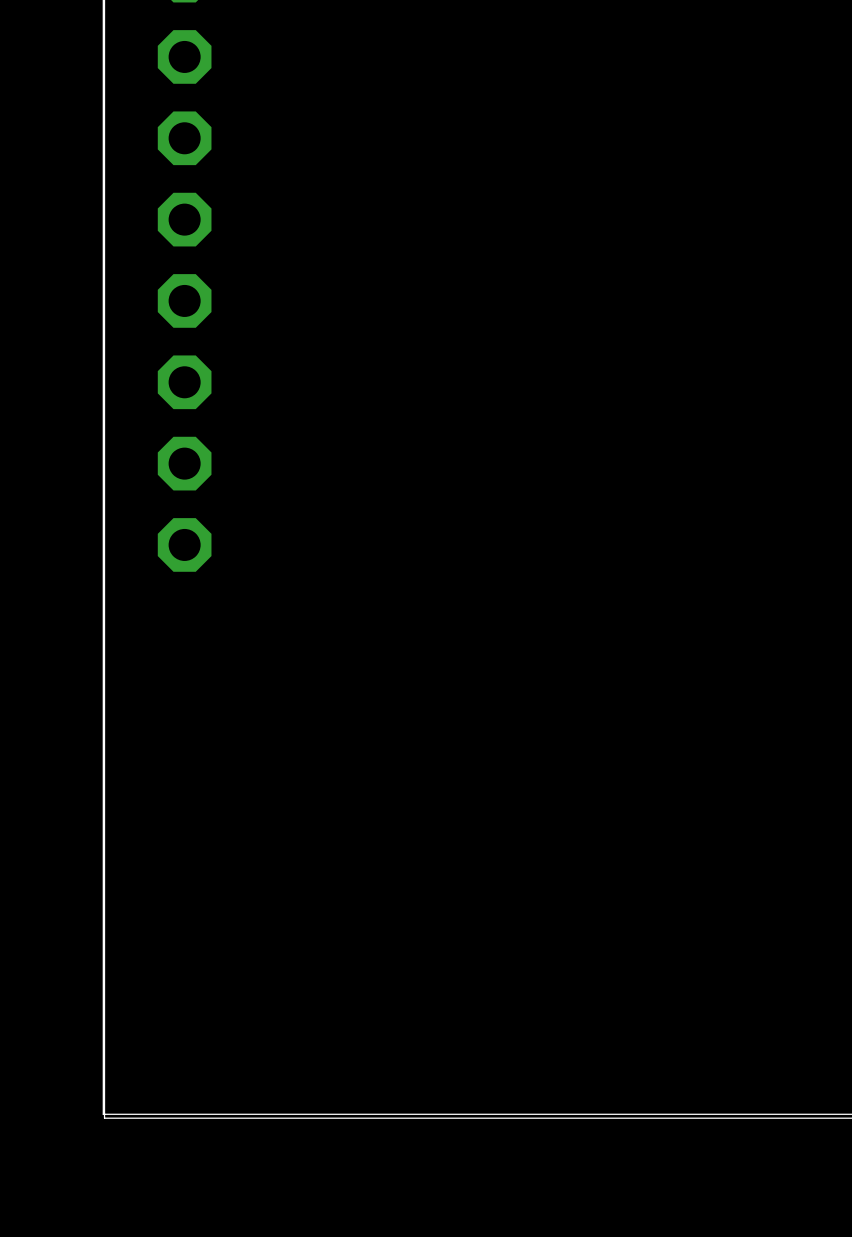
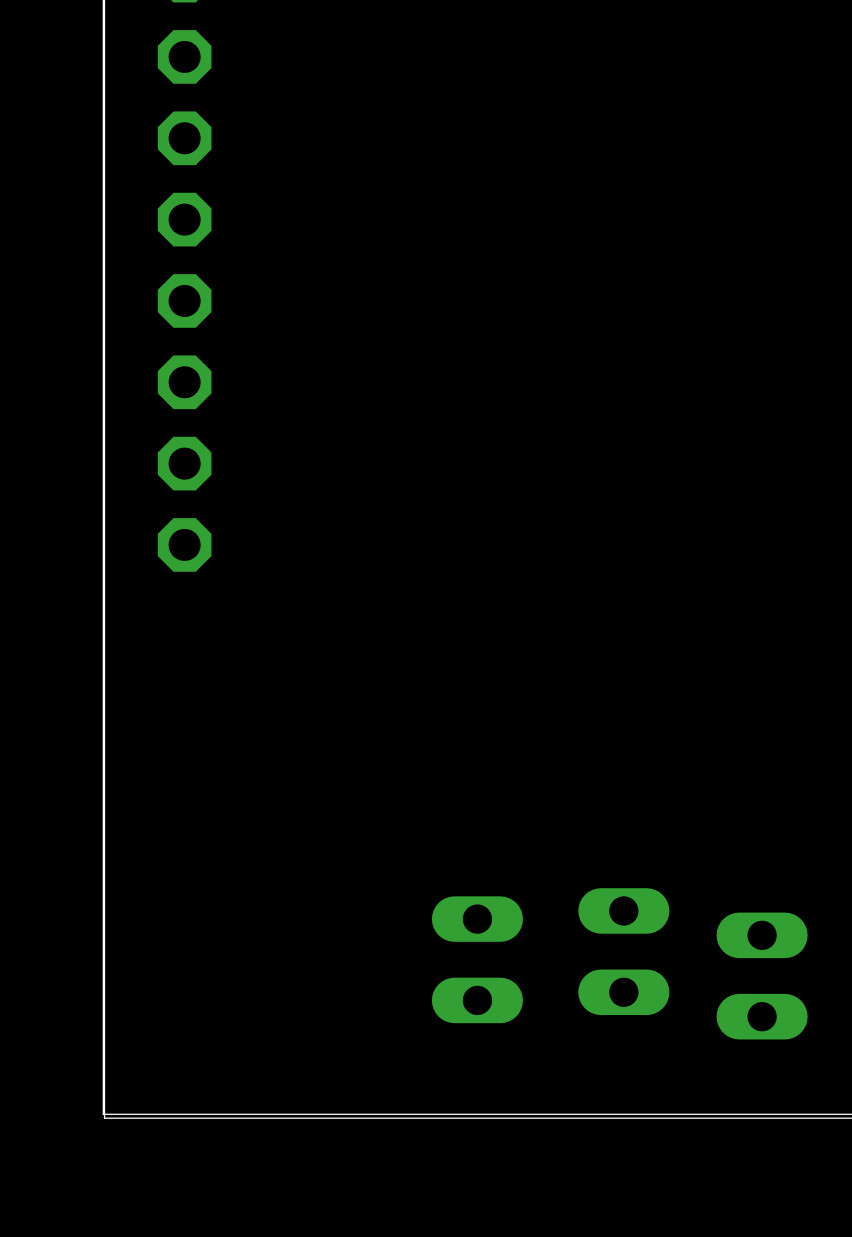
part: none -> (623, 951)
part: none -> (477, 959)
part: none -> (762, 976)

